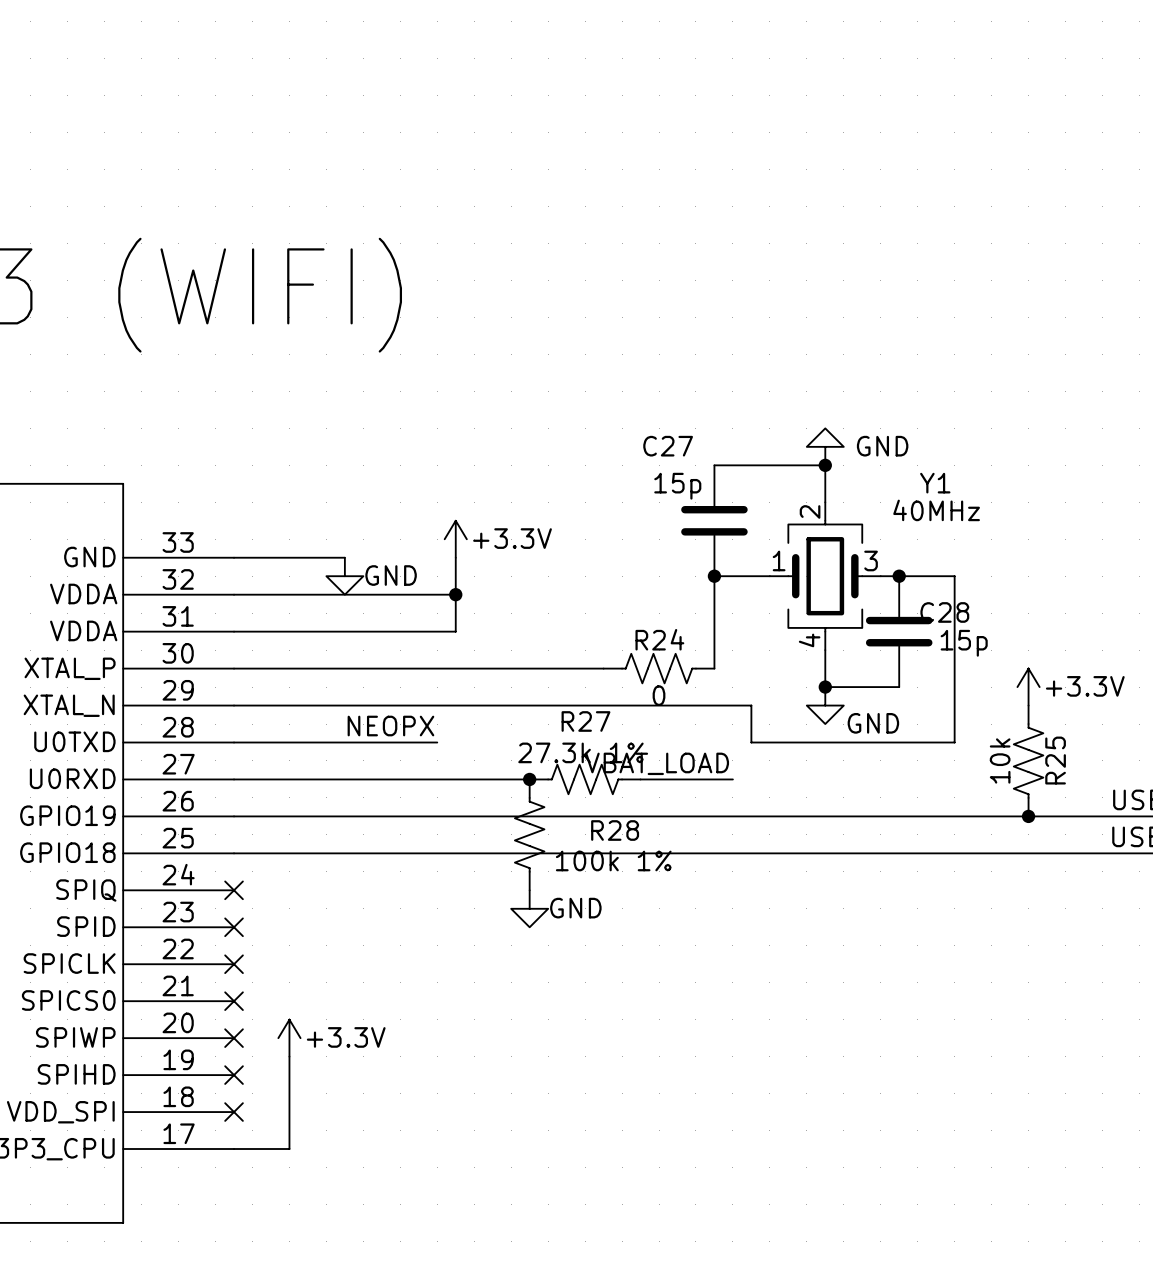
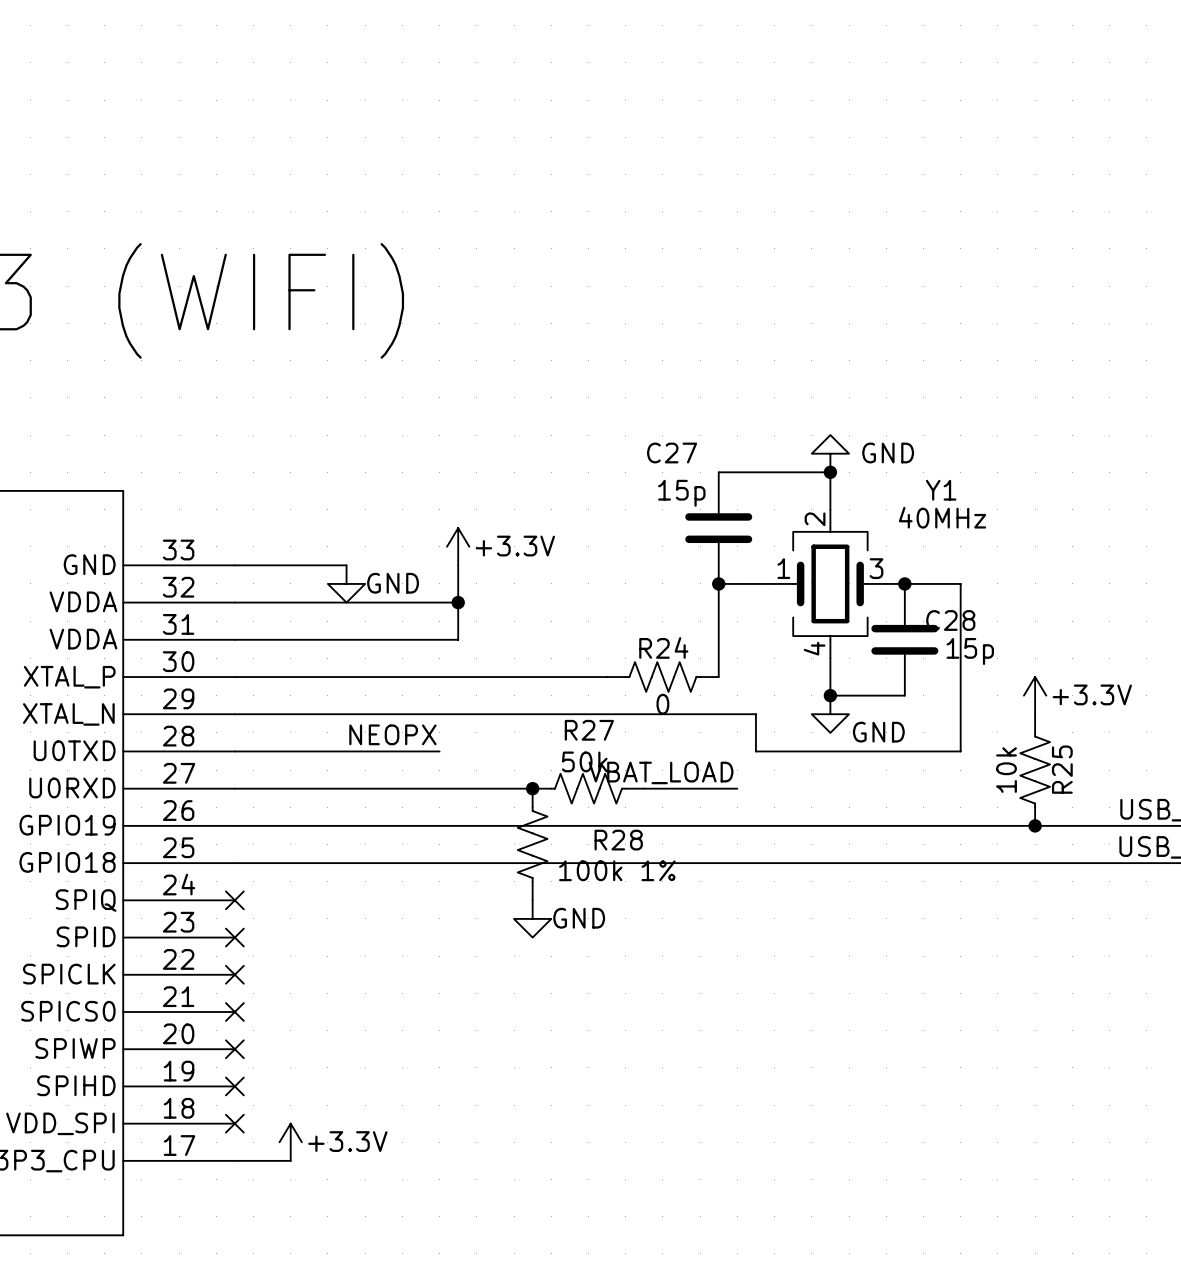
R27 value: 27.3k 1% (580, 752) -> 50k (584, 761)
power symbol position: +3.3V (289, 1038) -> +3.3V (290, 1142)
wire: (289, 1056) (289, 1149) -> none

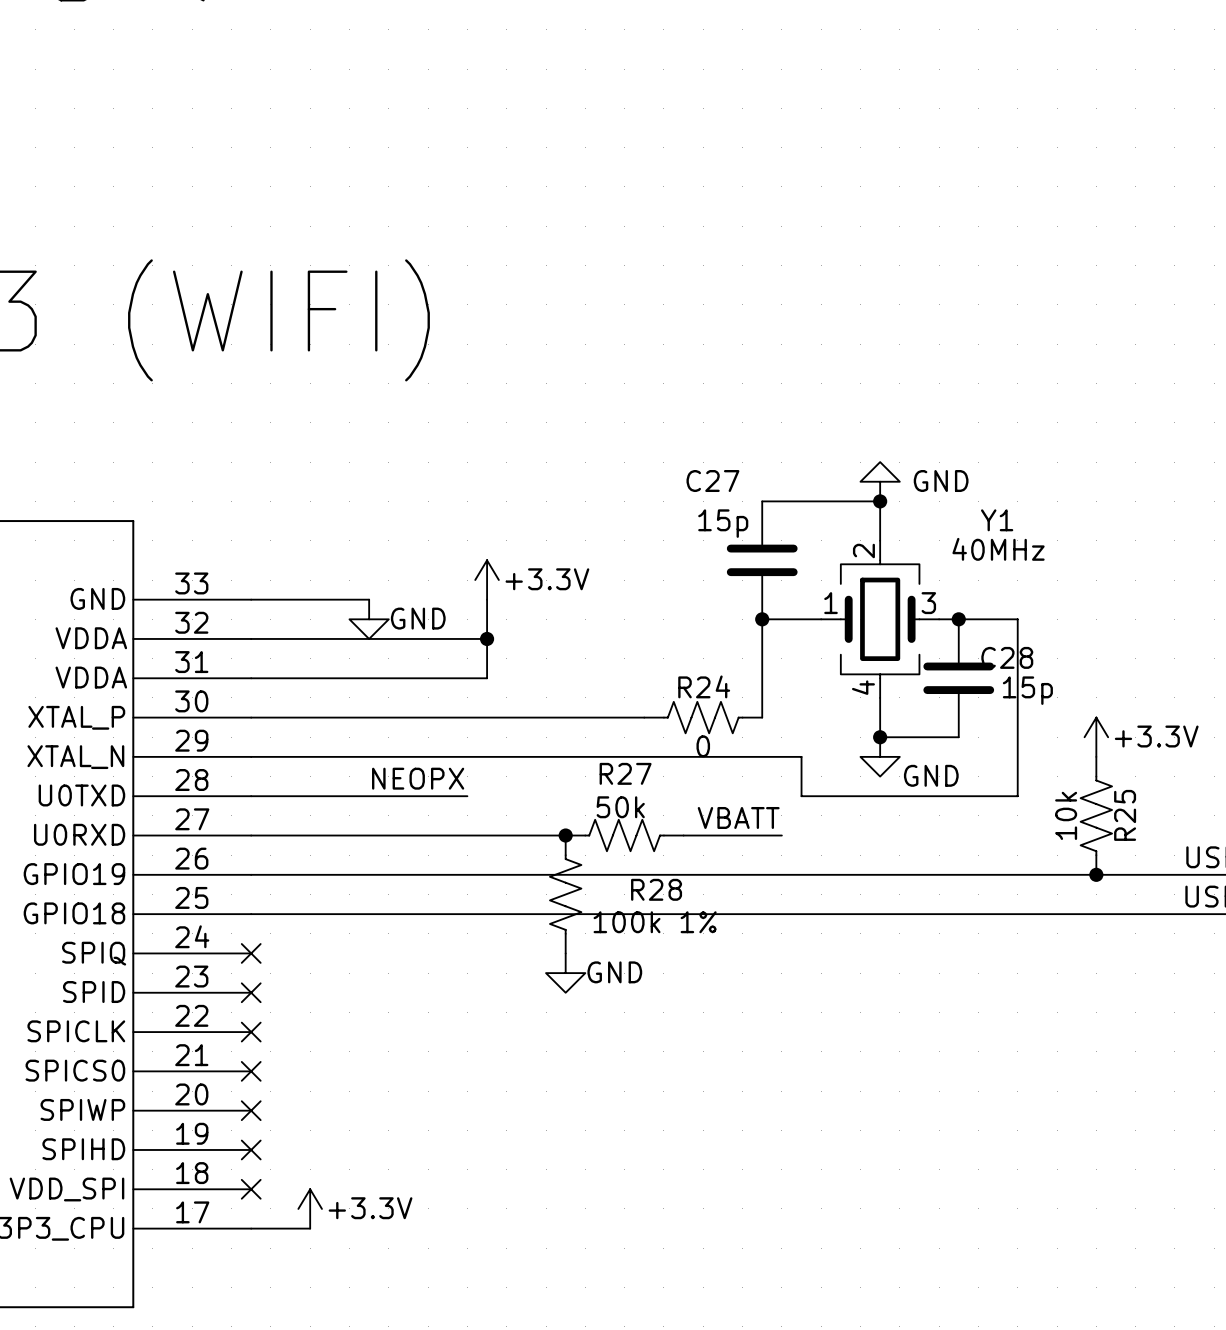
label: VBAT_LOAD (661, 772) -> VBATT (738, 817)

